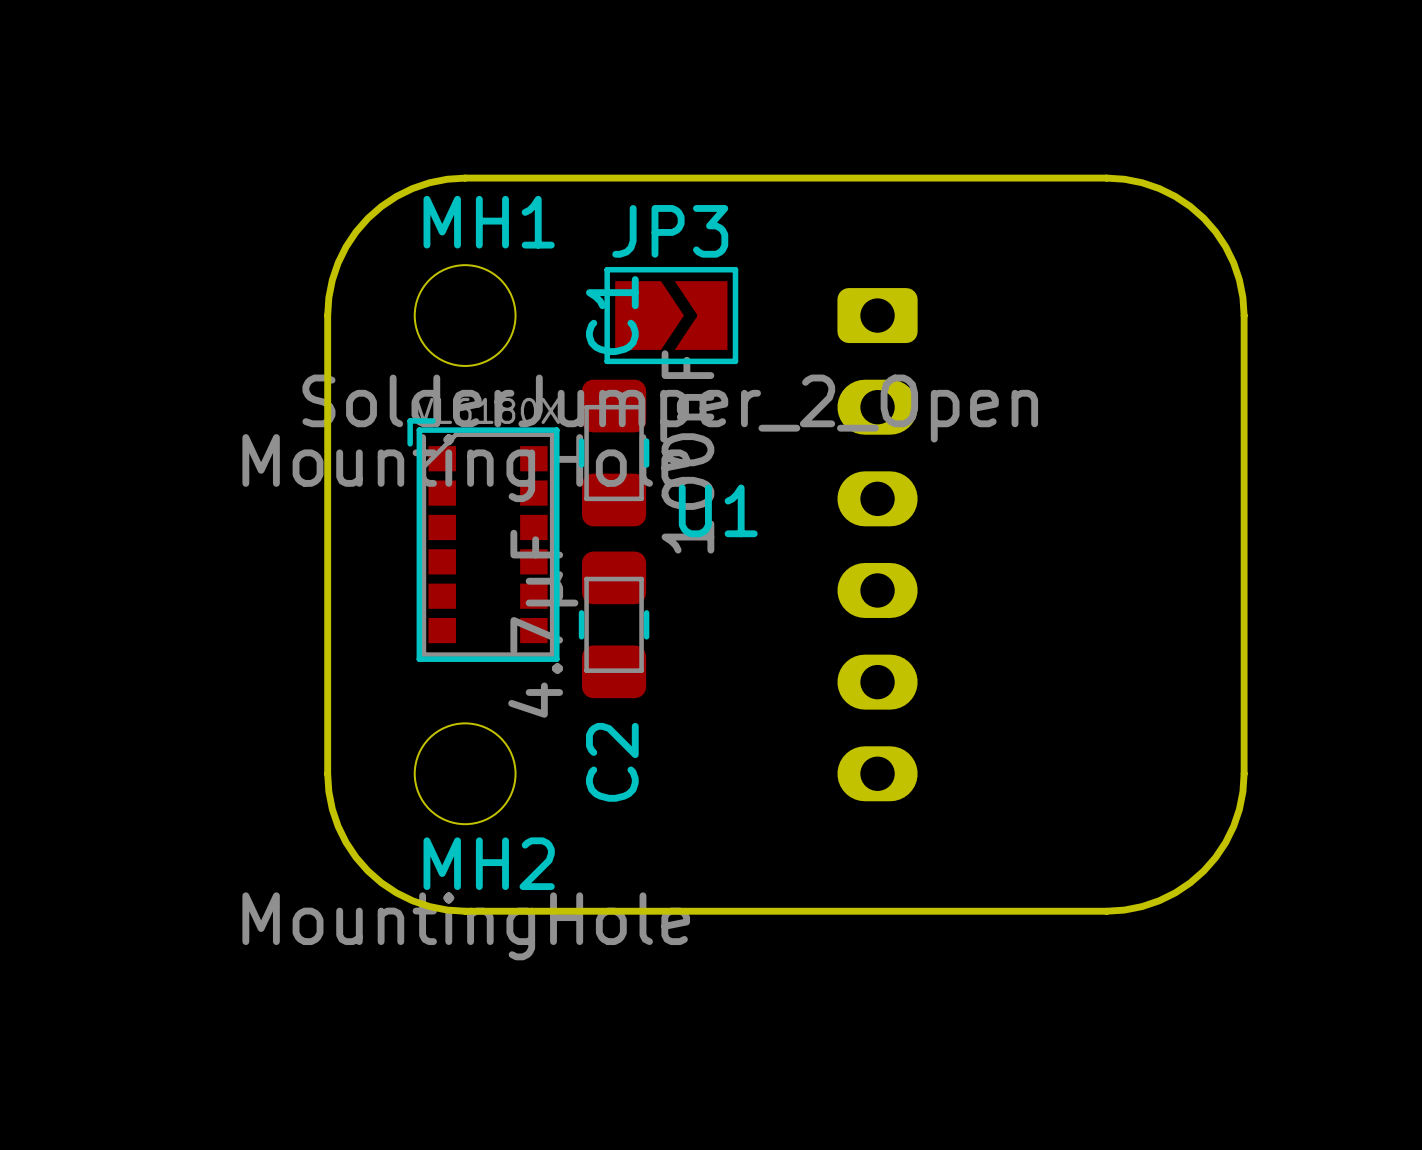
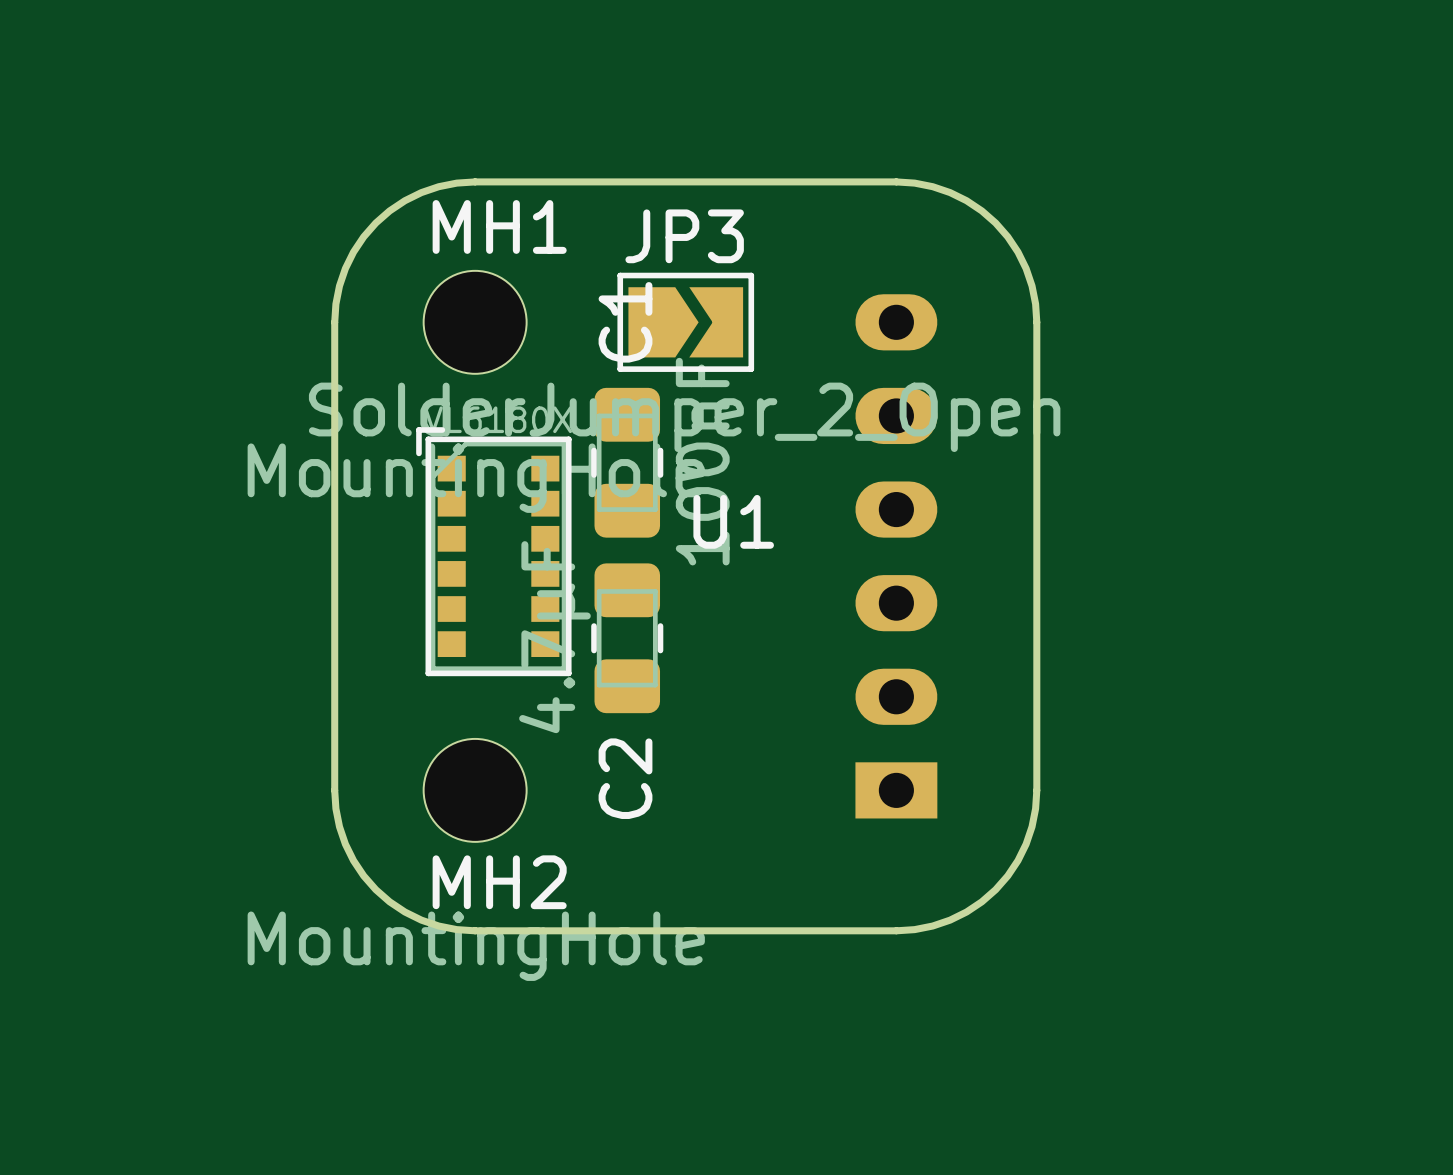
board edge: (877, 178) (1106, 178) (1124, 179) (1159, 188) (1175, 196) (1203, 218) (1225, 246) (1239, 279) (1244, 315) (1244, 773) (1239, 809) (1225, 842) (1203, 870) (1175, 892) (1159, 900) (1124, 910) (877, 911) -> (896, 181) (914, 183) (950, 192) (966, 200) (995, 223) (1018, 252) (1026, 268) (1035, 304) (1036, 322) (1036, 790) (1032, 826) (1018, 860) (995, 889) (981, 901) (950, 920) (914, 929) (896, 930)
part footprint: [837, 288, 918, 802] -> [855, 294, 938, 819]

